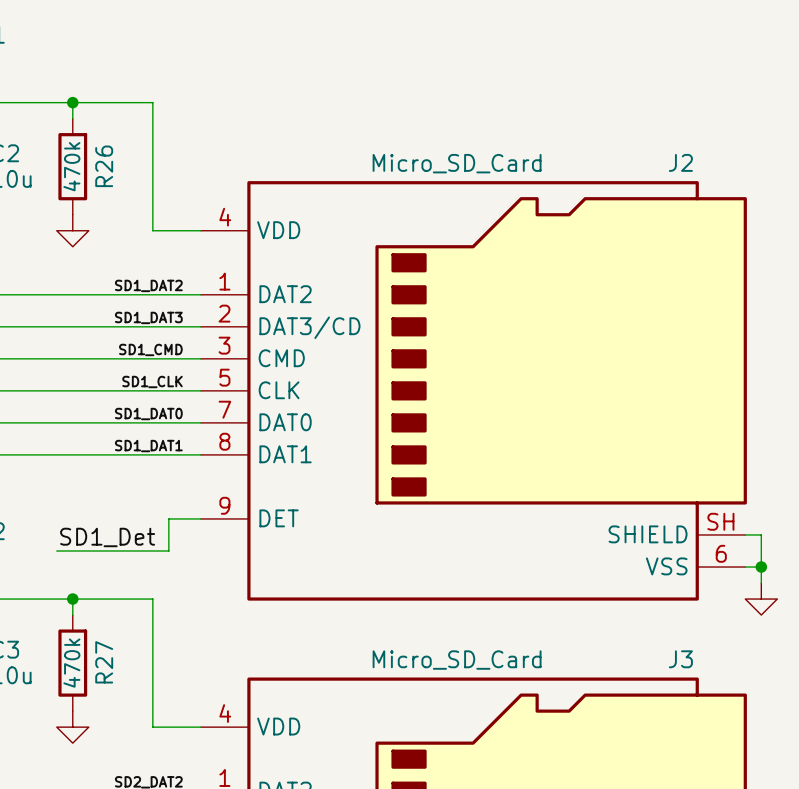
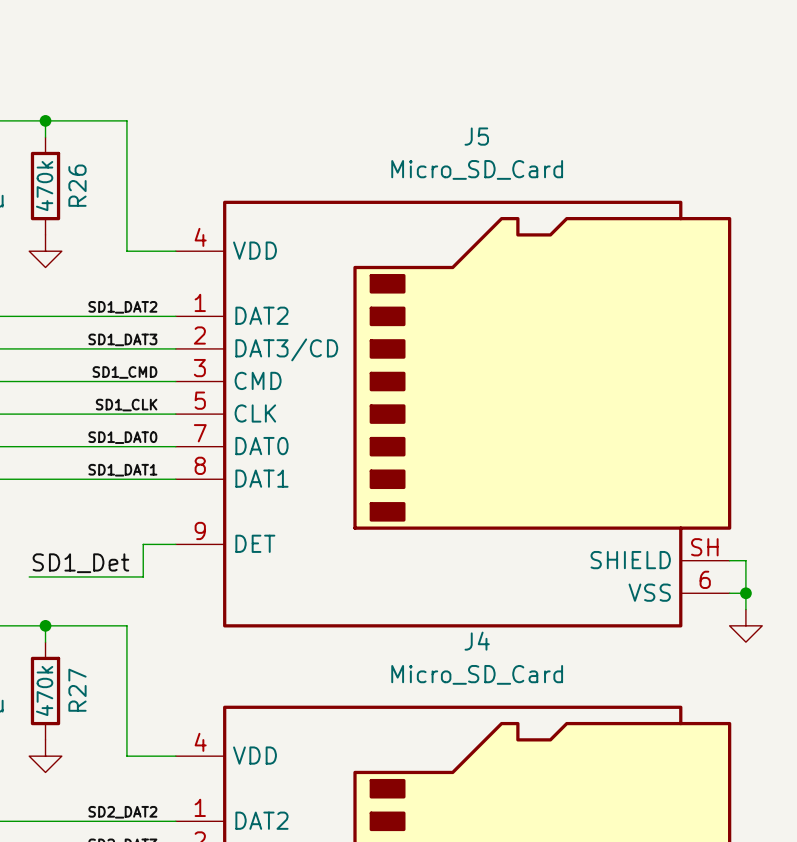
J2 name: J2 (680, 162) -> J5 (476, 136)
J2 value position: Micro_SD_Card (457, 163) -> Micro_SD_Card (477, 169)
J3 name: J3 (680, 659) -> J4 (477, 641)
J3 value position: Micro_SD_Card (457, 660) -> Micro_SD_Card (477, 674)

